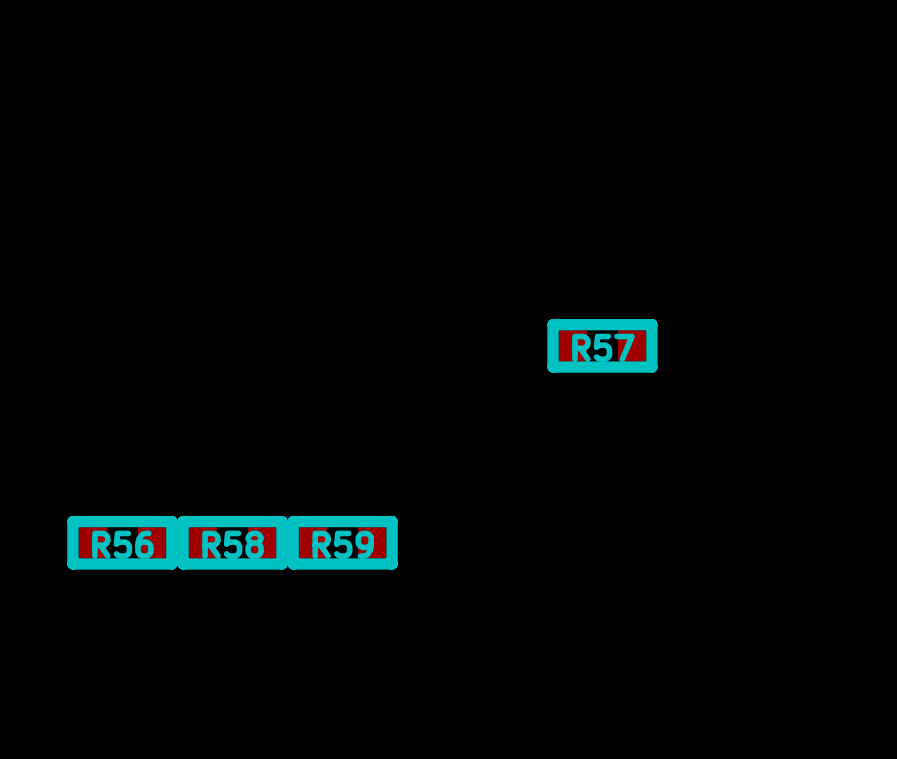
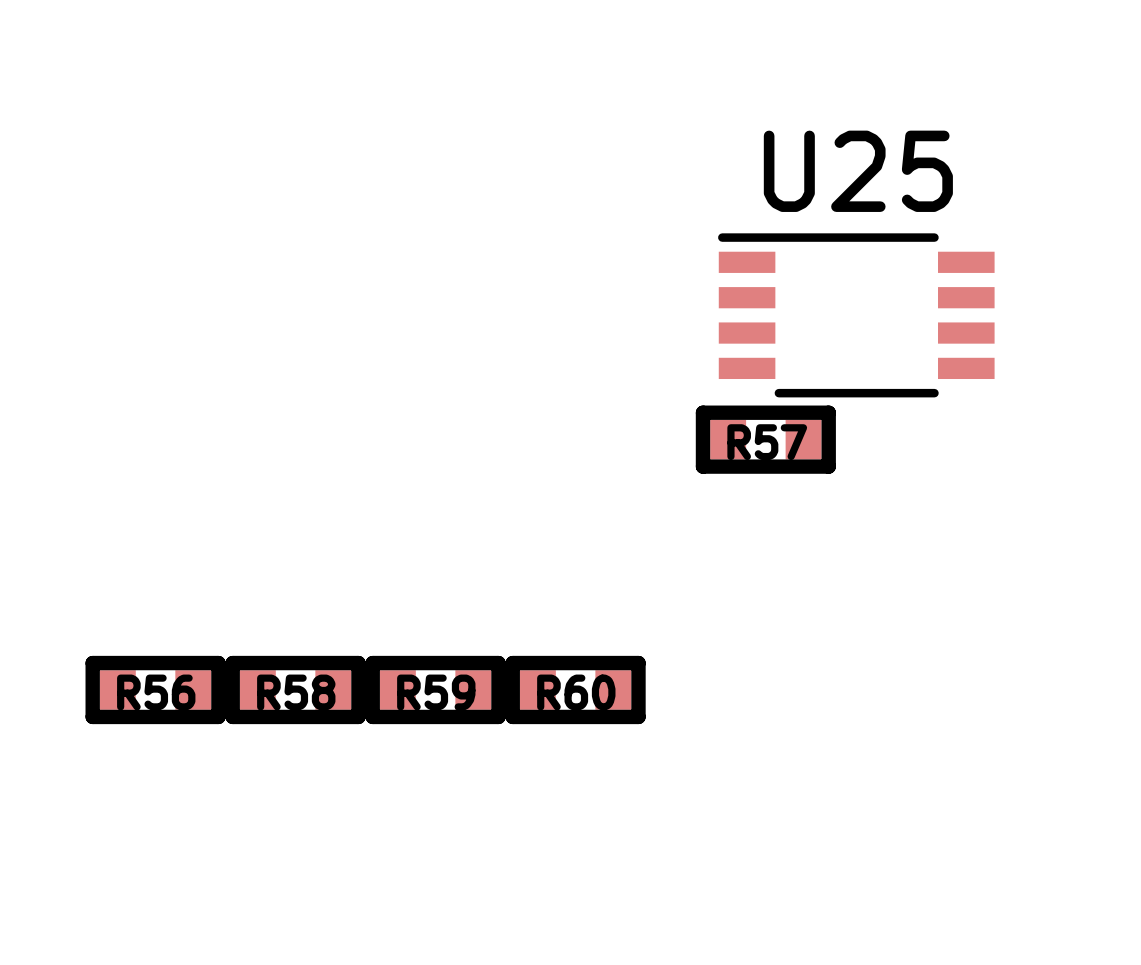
U25: none -> (856, 315)
R60: none -> (575, 689)

